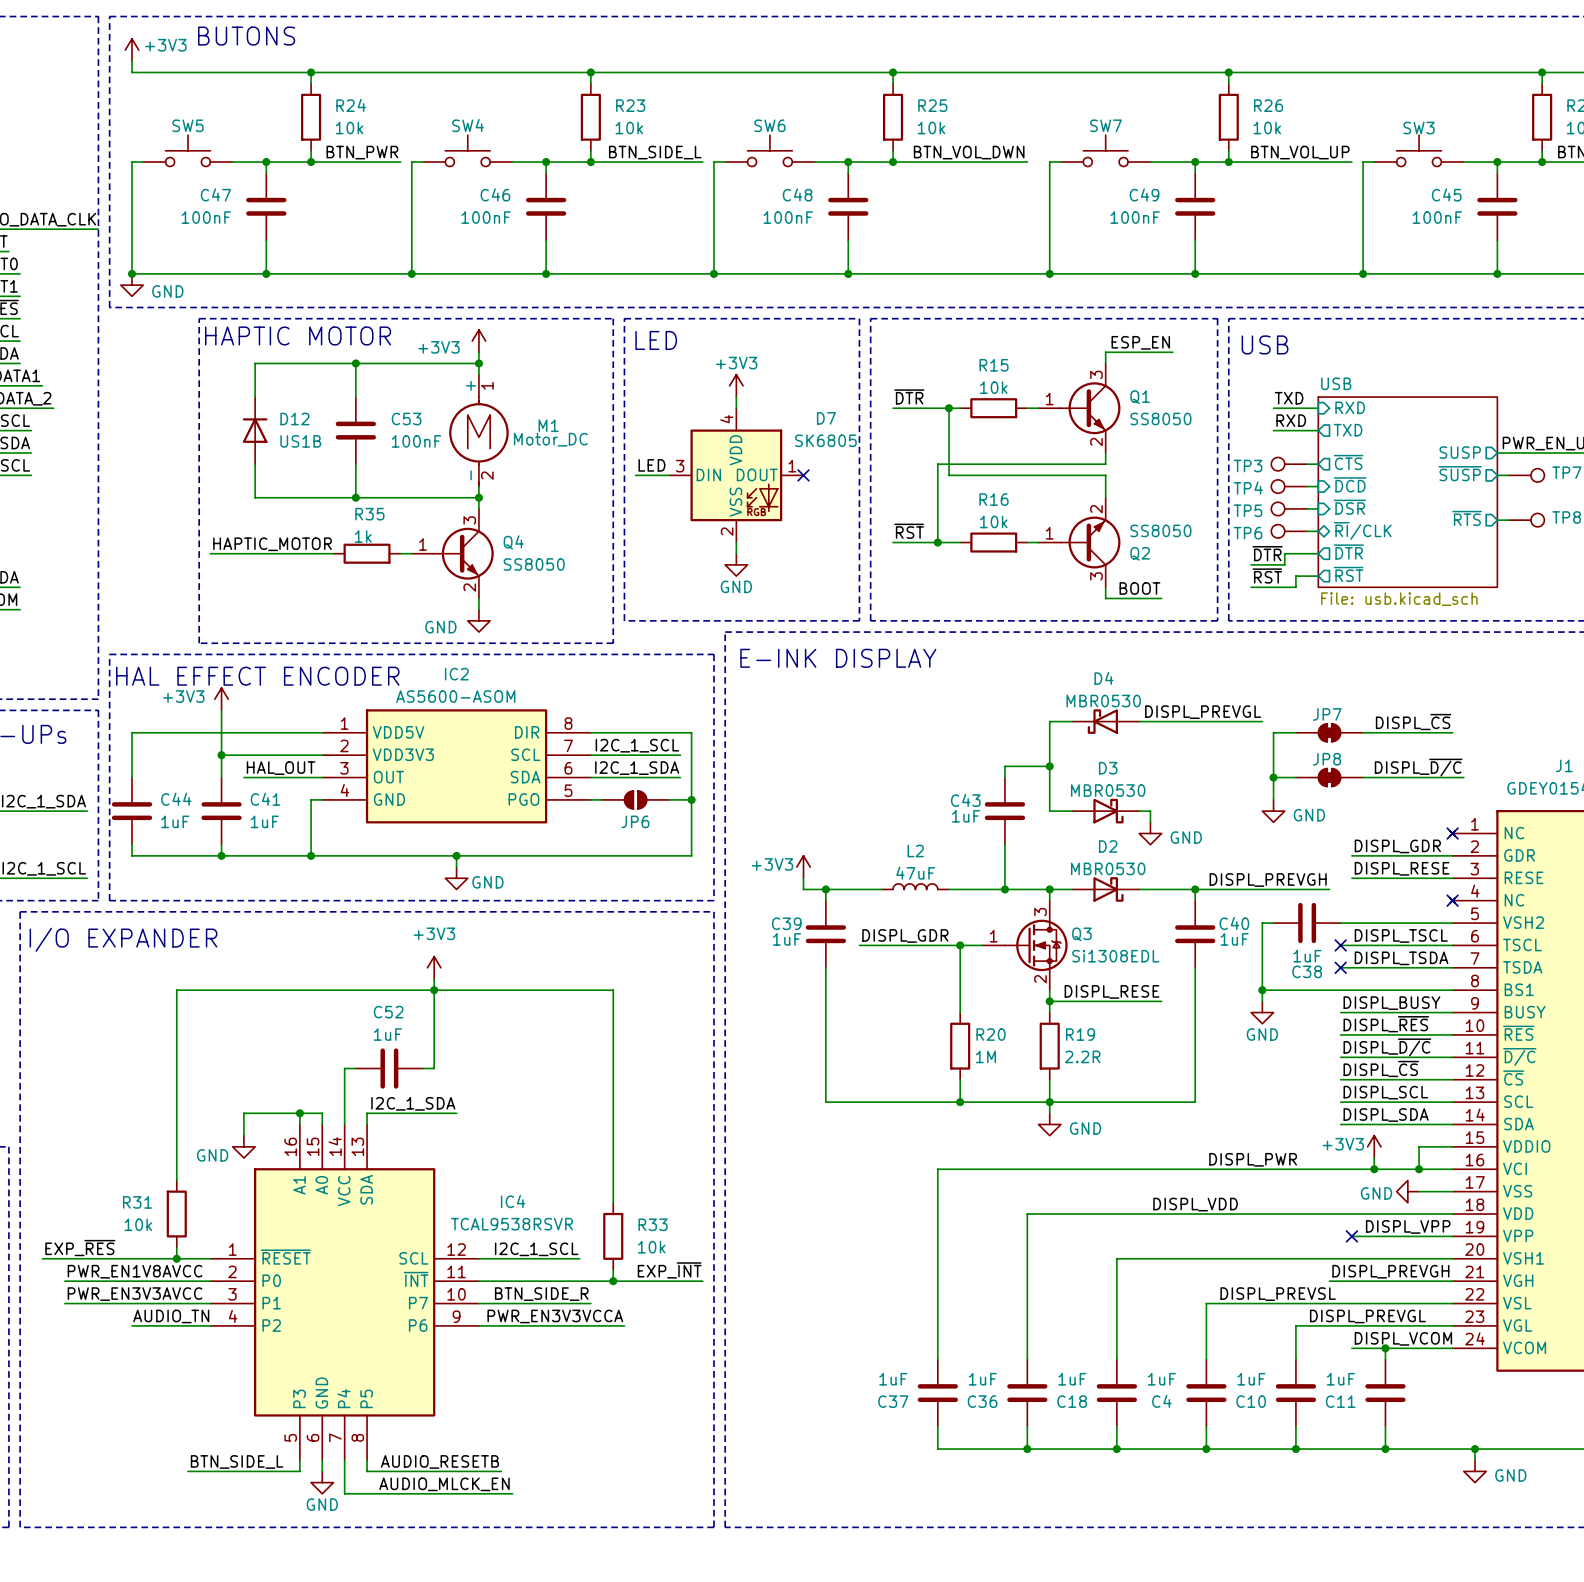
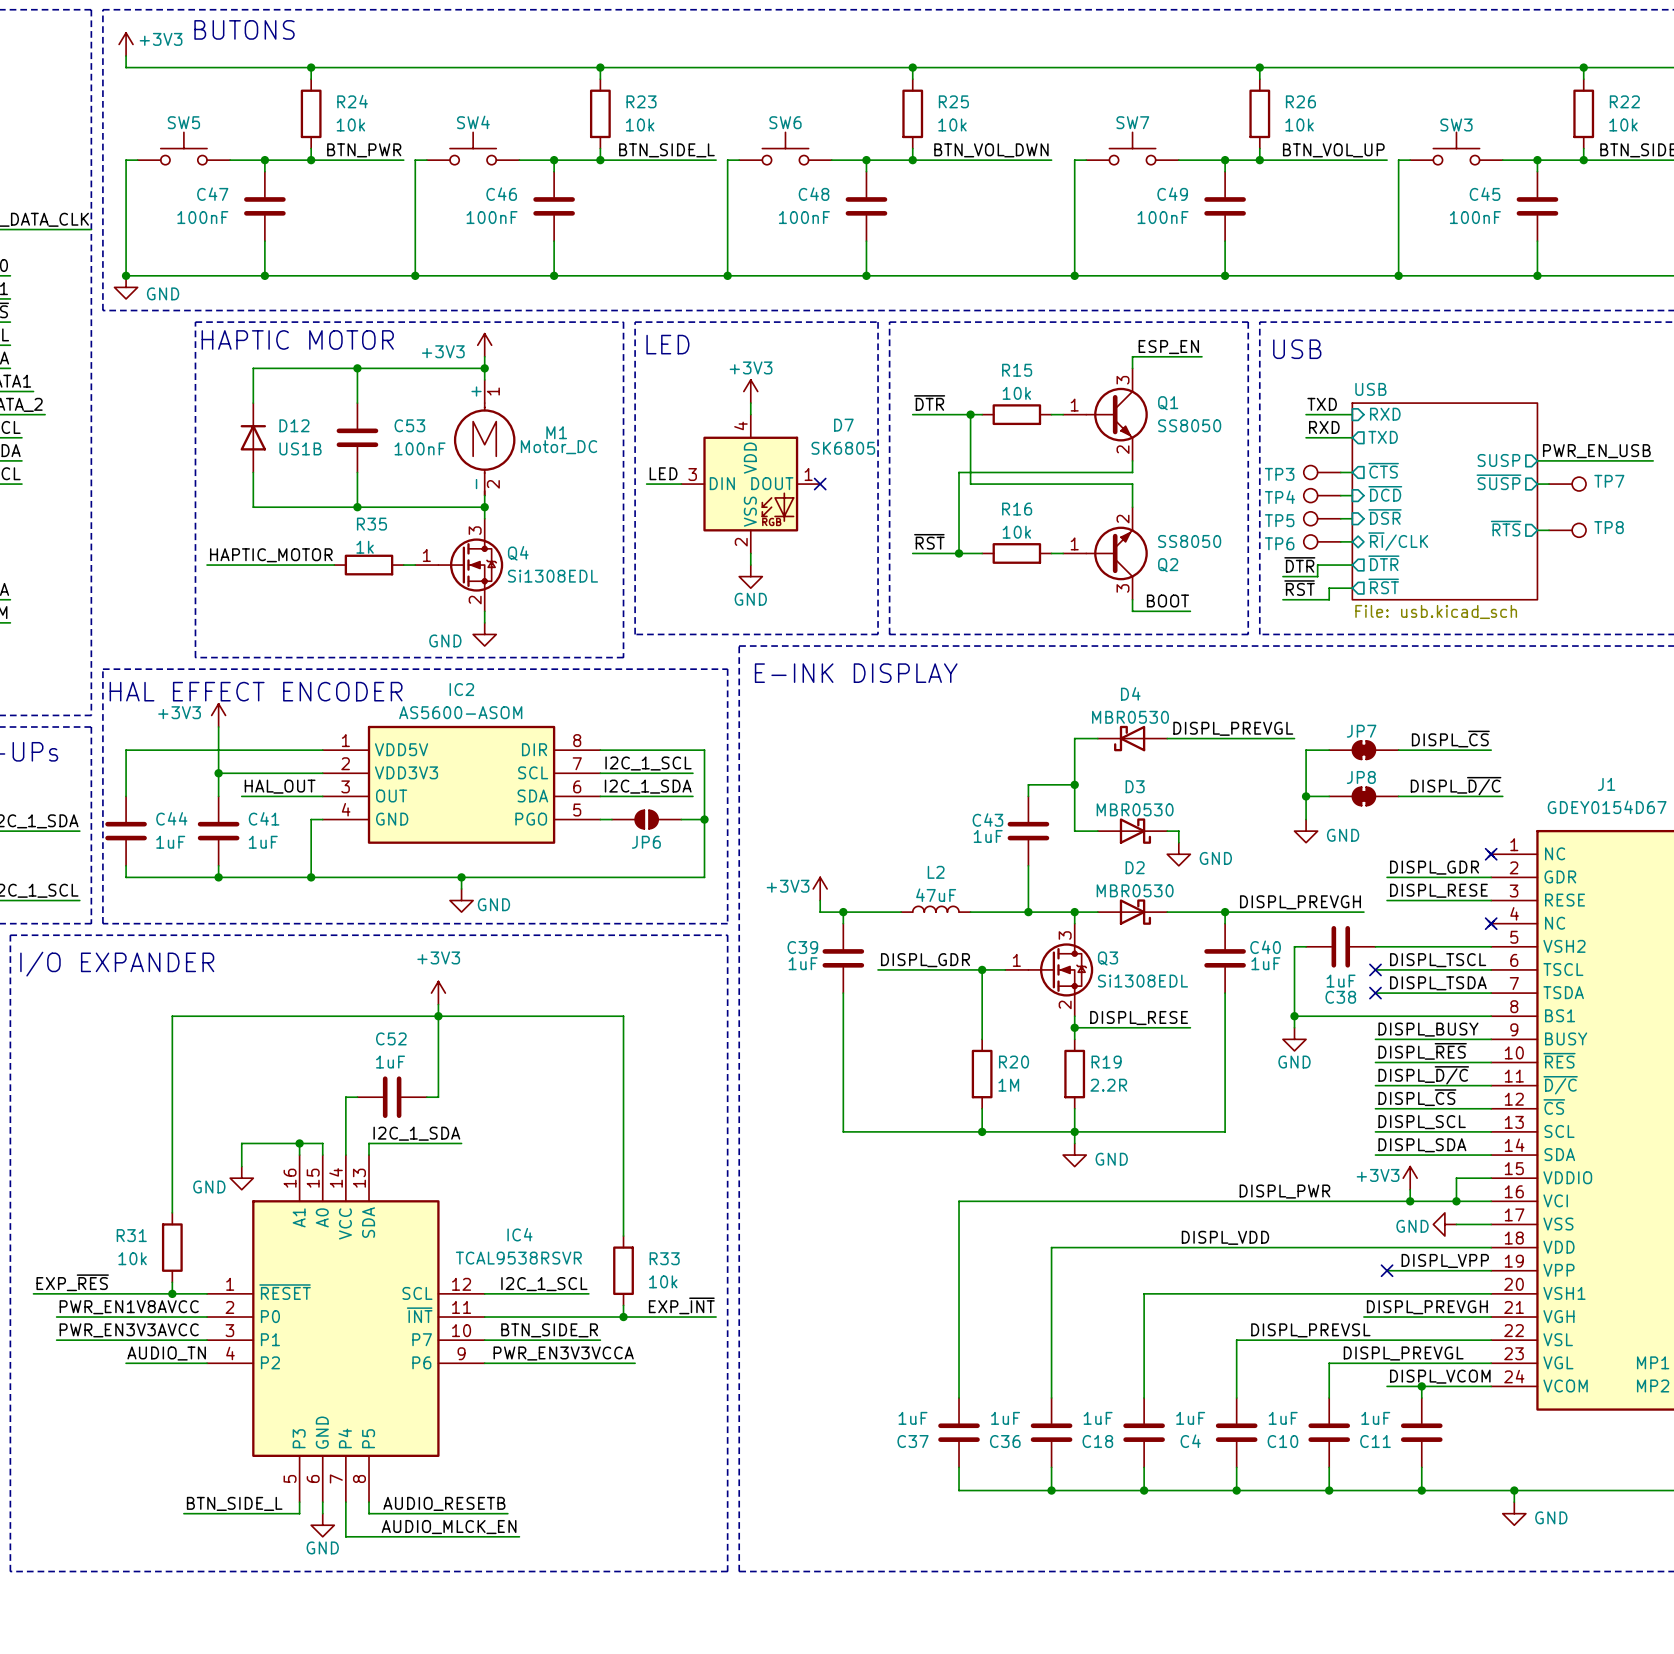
Q4 symbol: [411, 508, 494, 599] -> [415, 518, 504, 612]
Q4 value: SS8050 (534, 564) -> Si1308EDL (552, 576)

